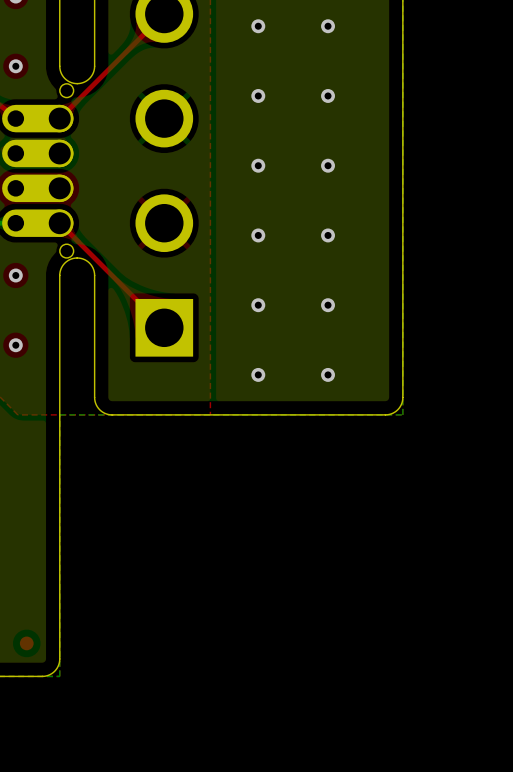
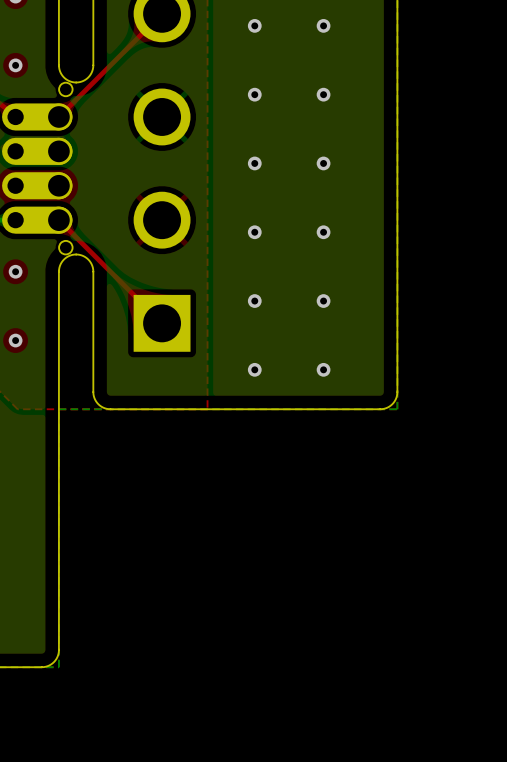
part: (26, 643) -> none

